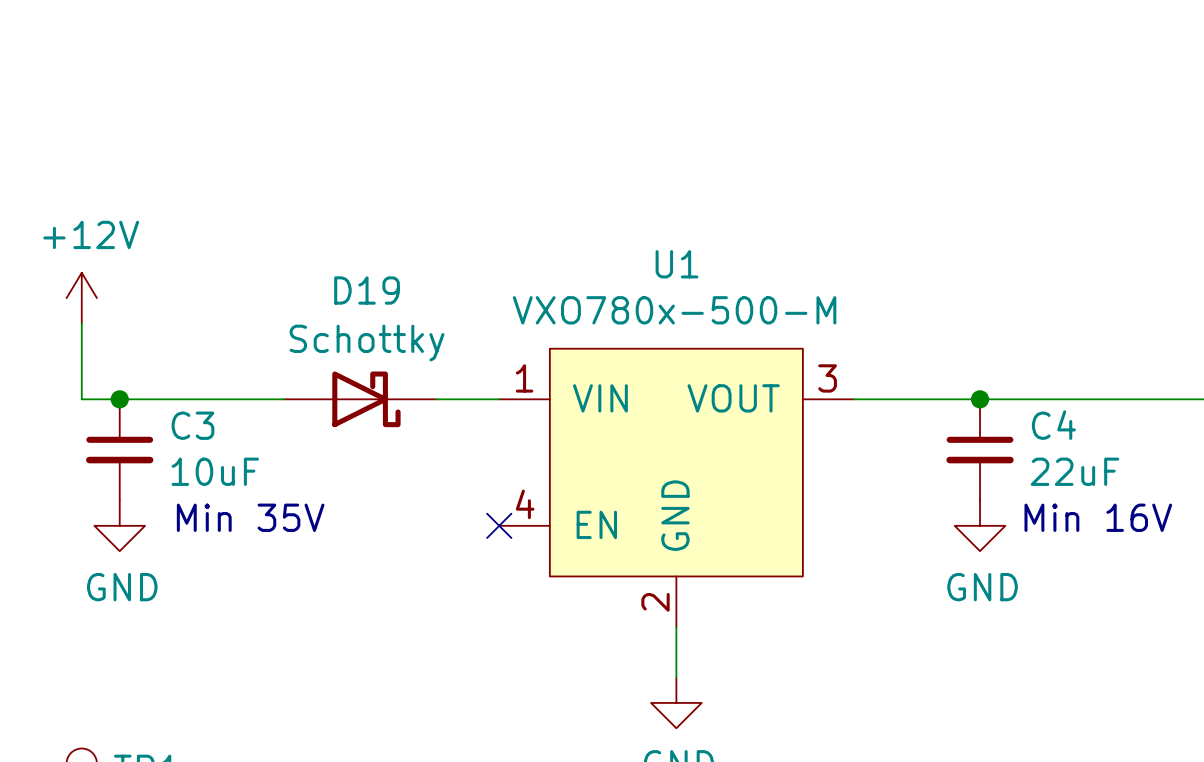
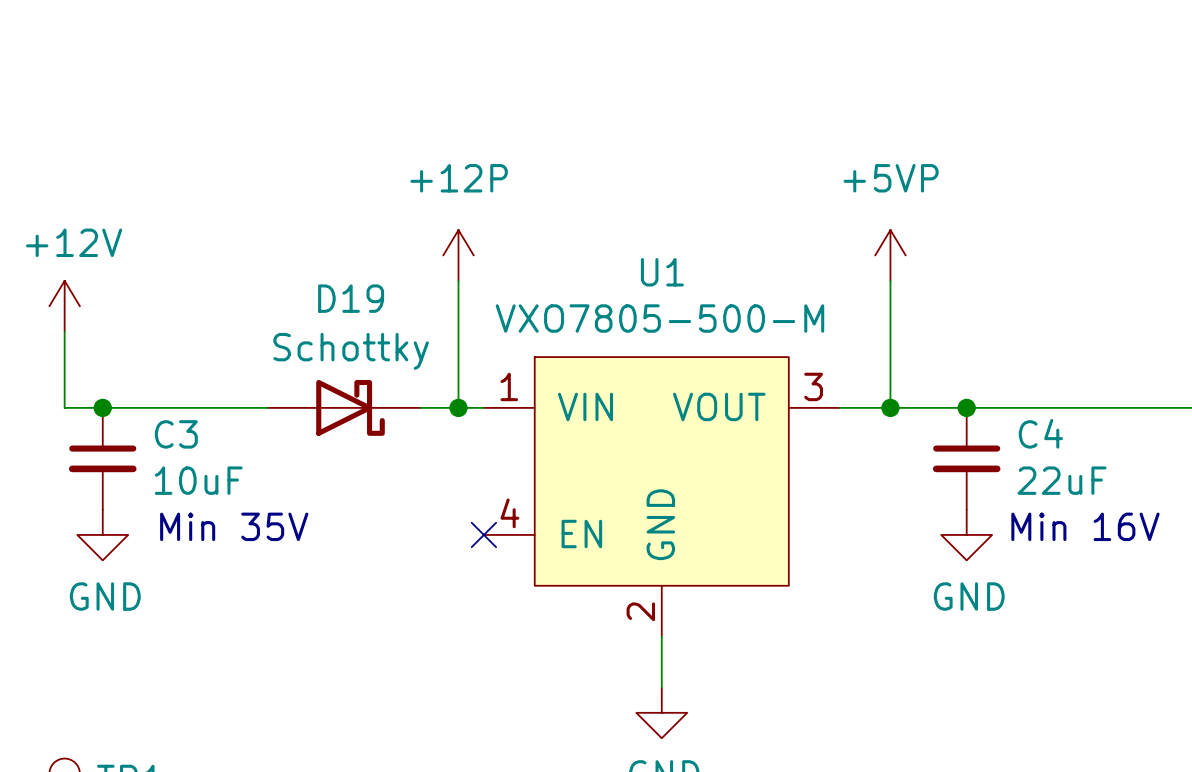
power symbol: none -> +12P (458, 255)
power symbol: none -> +5VP (890, 255)
wire: none -> (458, 280) (458, 407)
wire: none -> (890, 280) (890, 407)
U1 value: VXO780x-500-M (674, 310) -> VXO7805-500-M (659, 318)
junction: none -> (458, 407)
junction: none -> (890, 407)

